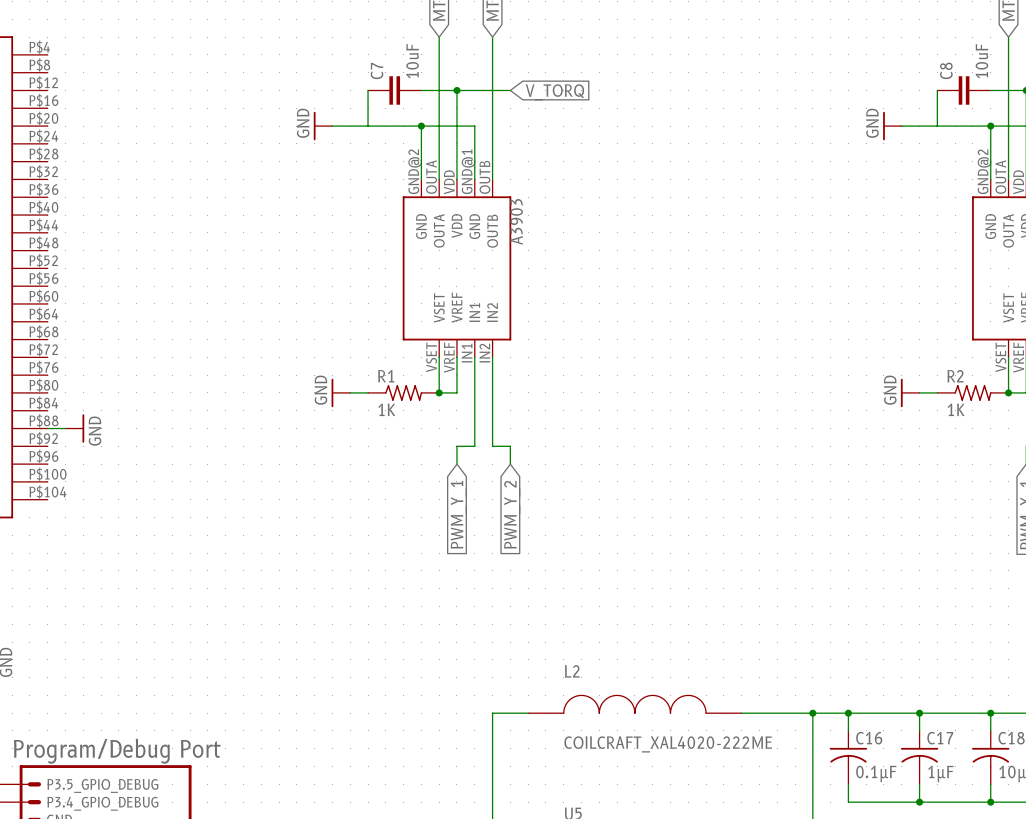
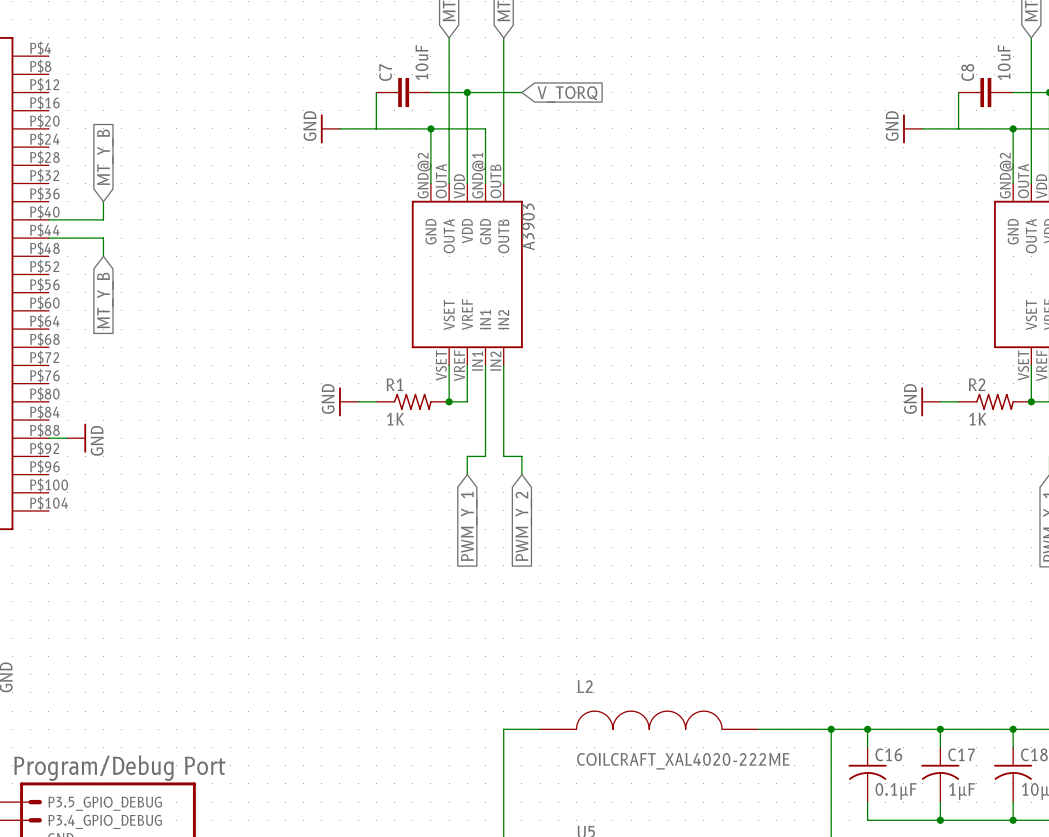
global label: none -> MT_Y_B (105, 157)
wire: none -> (103, 201) (103, 219) (48, 219)
wire: none -> (48, 238) (103, 238) (103, 256)
global label: none -> MT_Y_B (105, 300)

